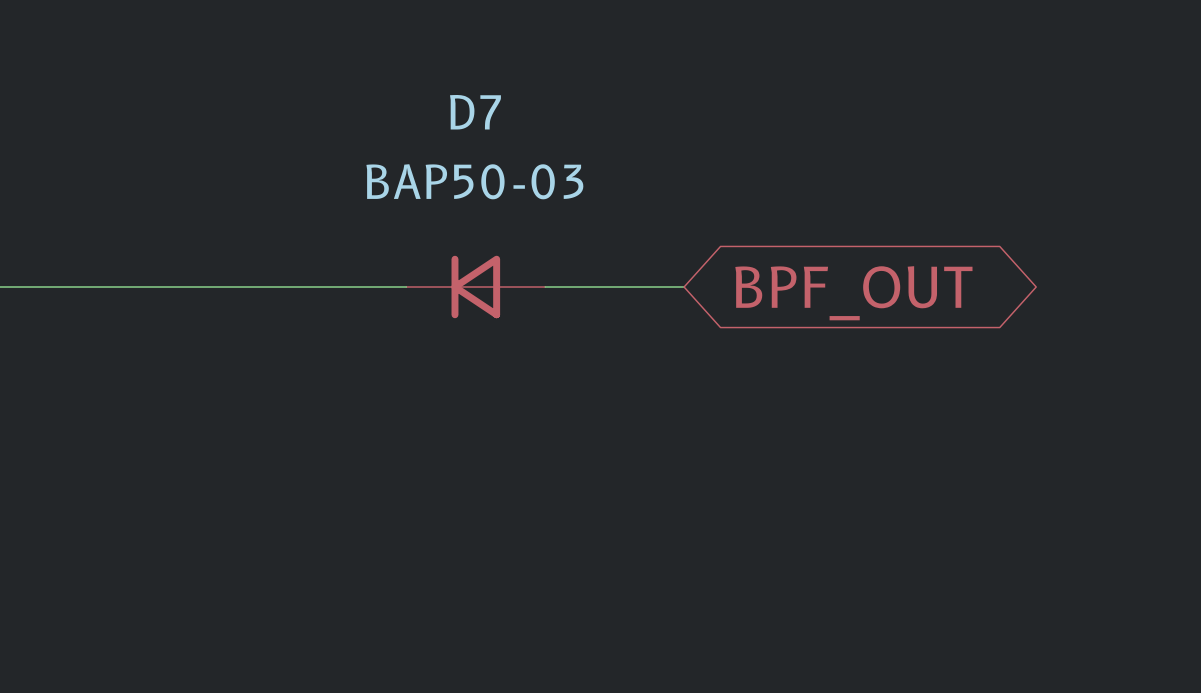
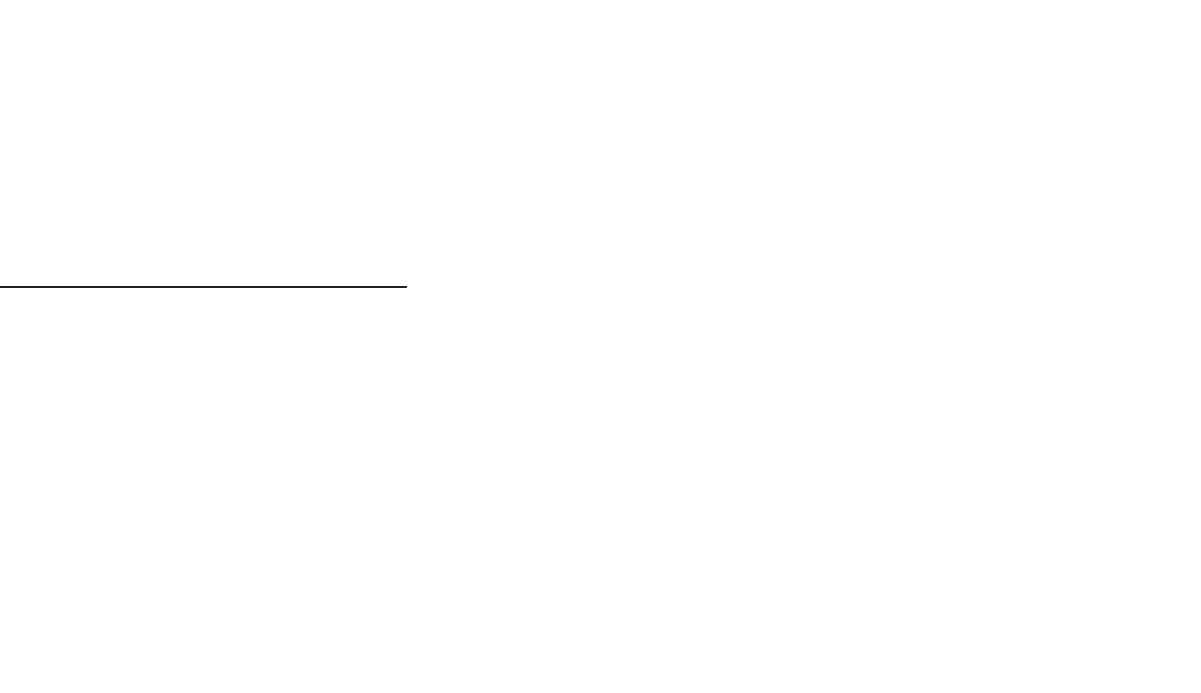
D7: BAP50-03 (475, 287) -> none
wire: (545, 287) (684, 287) -> none
global label: BPF_OUT (853, 293) -> none

